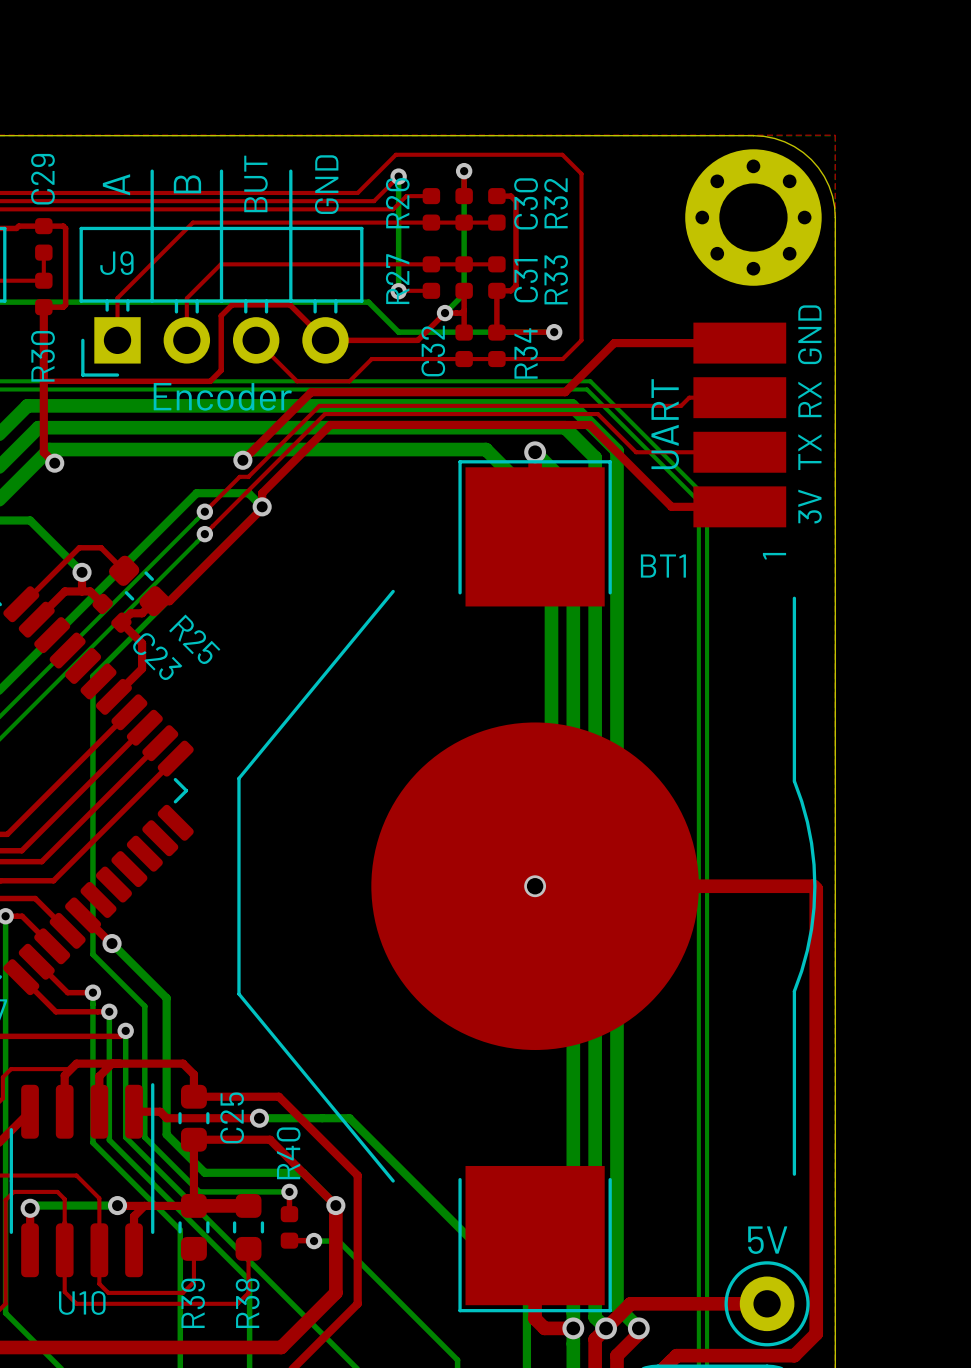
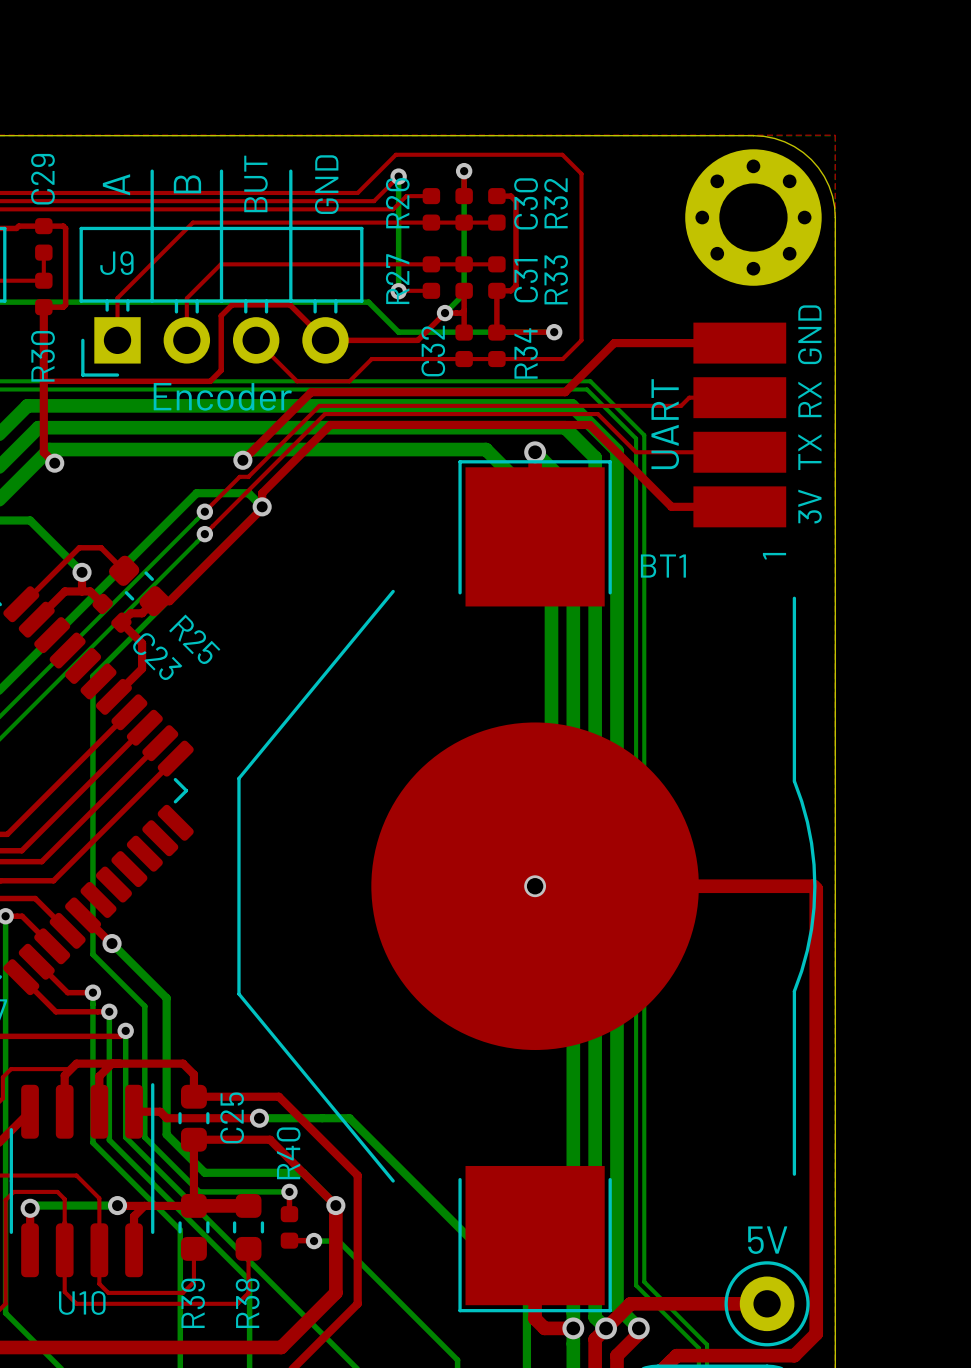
bottom track: (644, 435) (707, 498) (707, 1344) -> (644, 435) (644, 1281) (707, 1344)
bottom track: (636, 438) (698, 501) (698, 1348) -> (636, 438) (636, 1285) (698, 1348)

